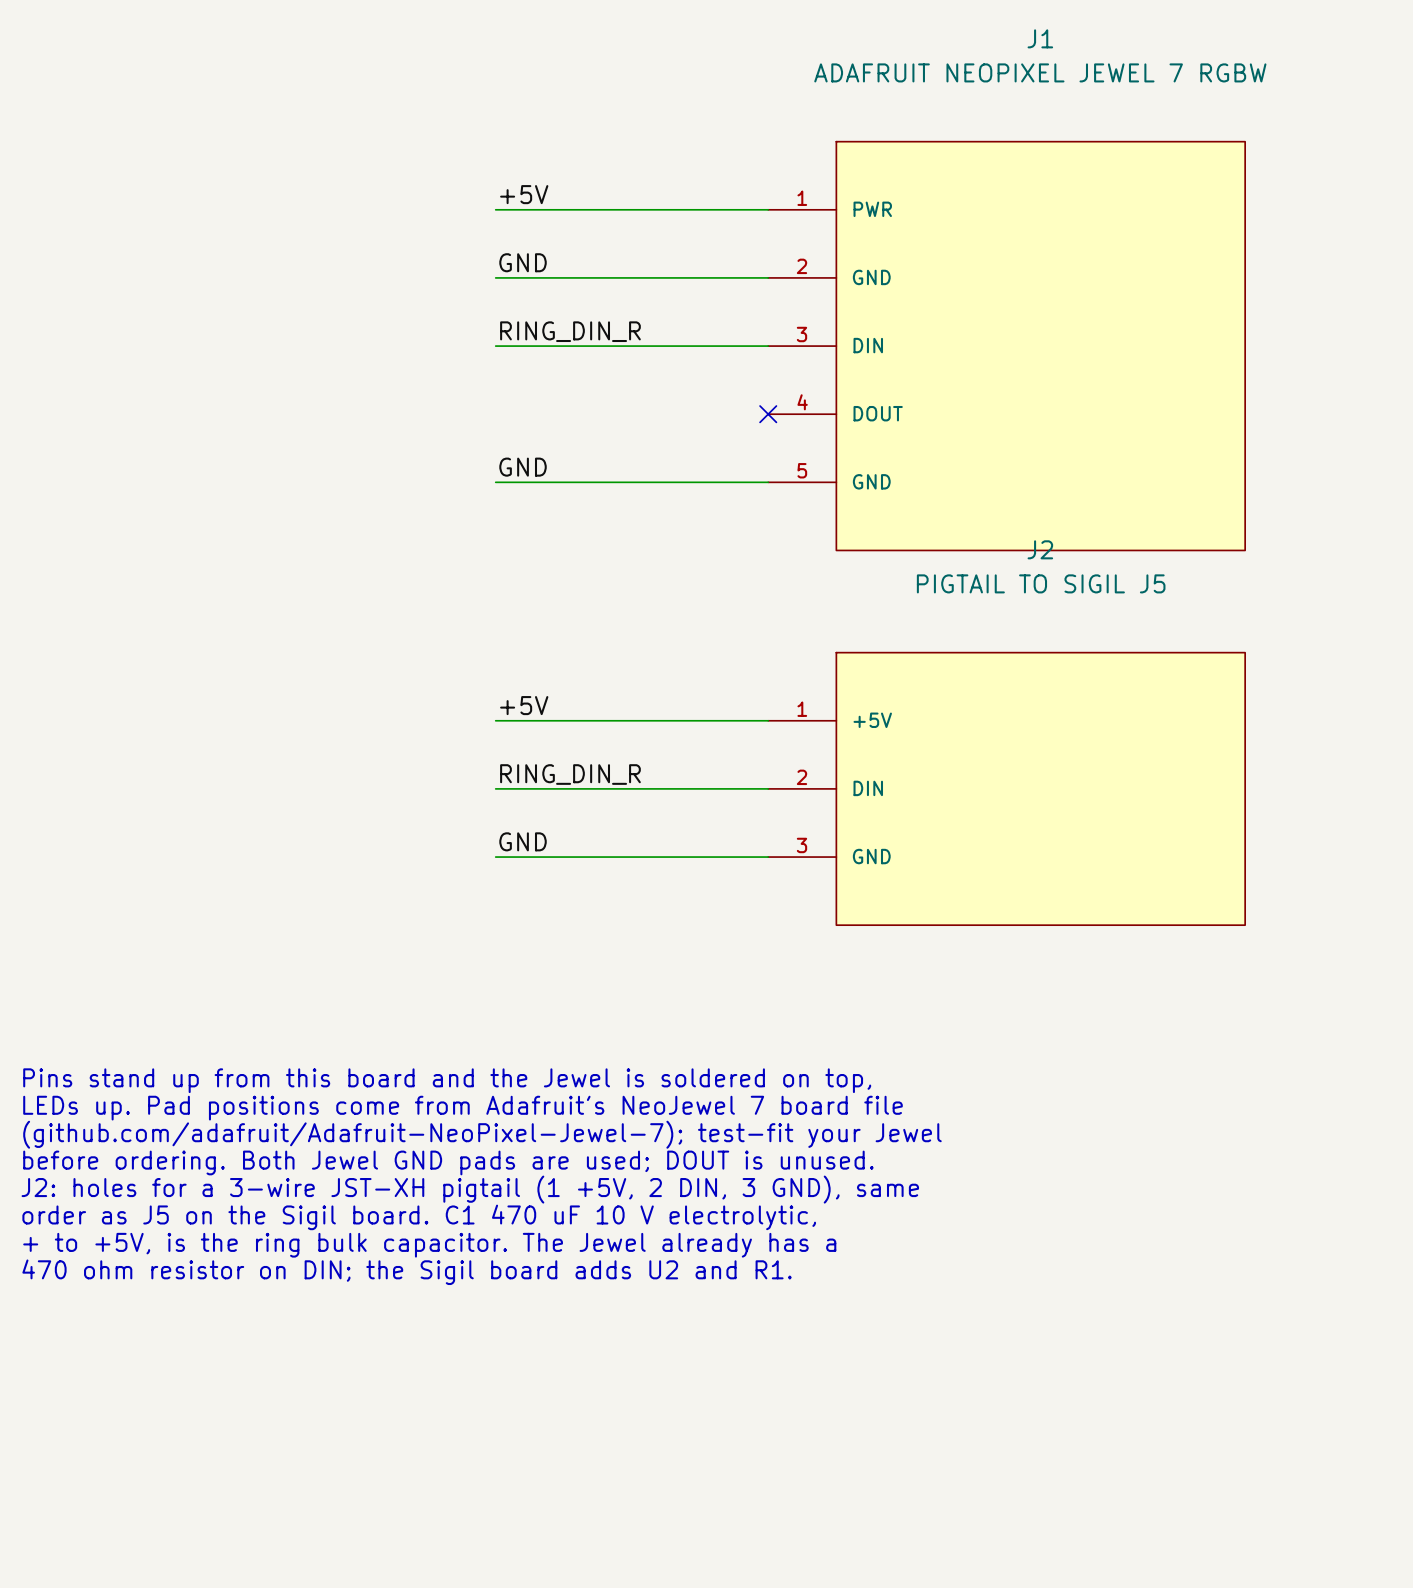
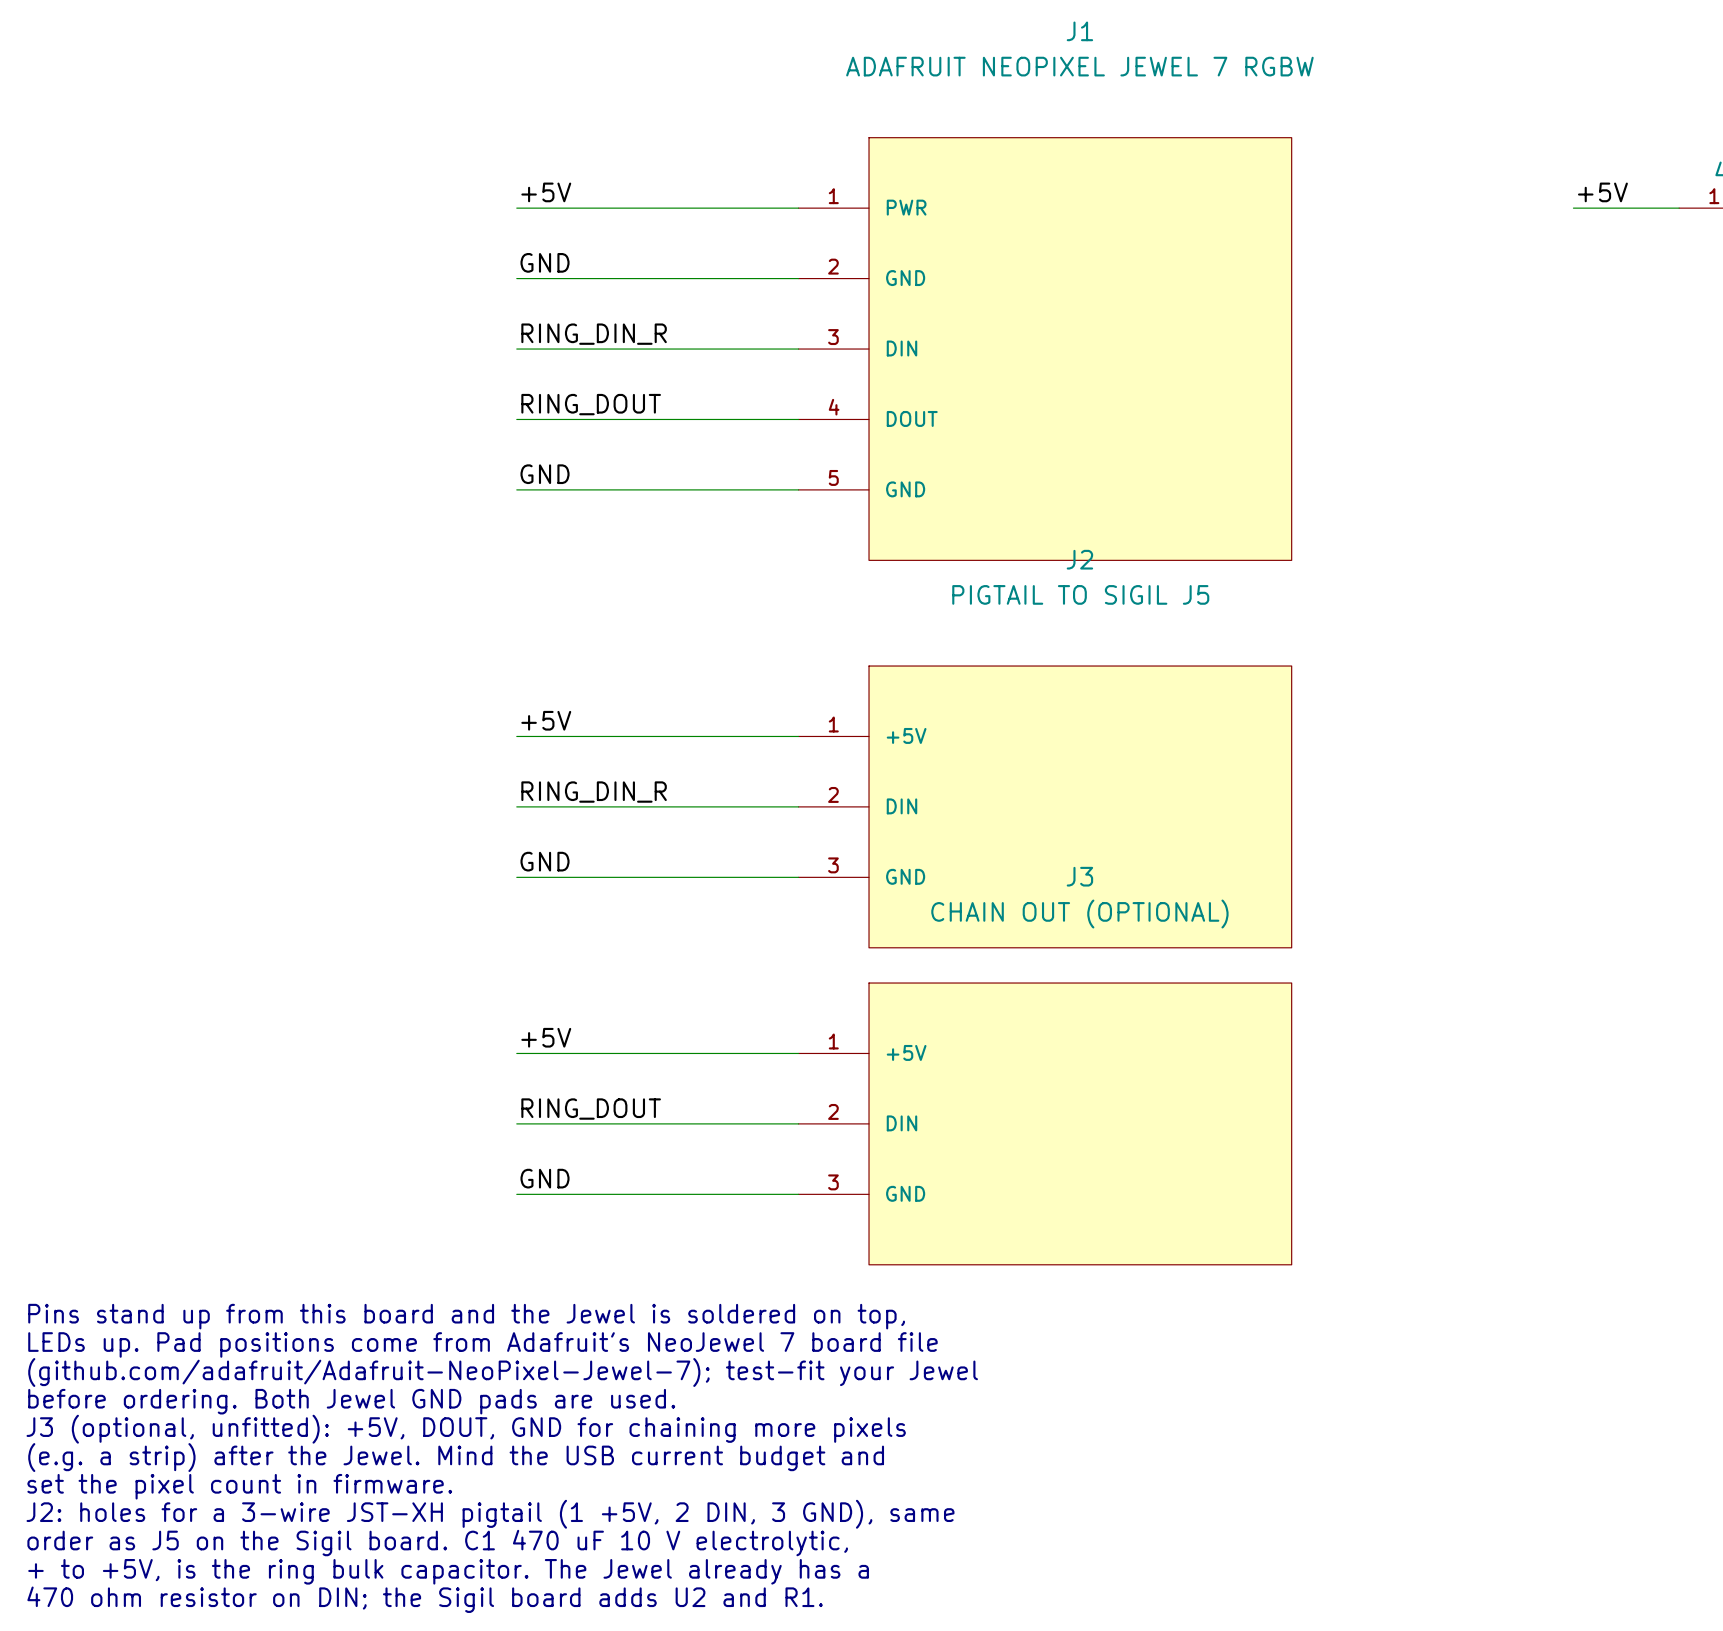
label: none -> RING_DOUT (591, 404)
wire: none -> (516, 419) (798, 419)
no-connect mark: (768, 414) -> none
label: none -> +5V (546, 1037)
wire: none -> (516, 1053) (798, 1053)
text position: Pins stand up from this board and the Jewel is soldered on top, (447, 1080) -> Pins stand up from this board and the Jewel is soldered on top, (466, 1316)
label: none -> RING_DOUT (591, 1109)
wire: none -> (516, 1123) (798, 1123)
J3: none -> CHAIN OUT (OPTIONAL) (1045, 1123)
text position: LEDs up. Pad positions come from Adafruit's NeoJewel 7 board file (463, 1108) -> LEDs up. Pad positions come from Adafruit's NeoJewel 7 board file (482, 1344)
text position: (github.com/adafruit/Adafruit-NeoPixel-Jewel-7); test-fit your Jewel (482, 1134) -> (github.com/adafruit/Adafruit-NeoPixel-Jewel-7); test-fit your Jewel (503, 1372)
label: none -> GND (545, 1178)
text: before ordering. Both Jewel GND pads are used; DOUT is unused. (448, 1162) -> none
wire: none -> (516, 1194) (798, 1194)
text position: J2: holes for a 3-wire JST-XH pigtail (1 +5V, 2 DIN, 3 GND), same (470, 1189) -> J2: holes for a 3-wire JST-XH pigtail (1 +5V, 2 DIN, 3 GND), same (490, 1514)
text position: order as J5 on the Sigil board. C1 470 uF 10 V electrolytic, (419, 1217) -> order as J5 on the Sigil board. C1 470 uF 10 V electrolytic, (437, 1543)
text position: + to +5V, is the ring bulk capacitor. The Jewel already has a (429, 1245) -> + to +5V, is the ring bulk capacitor. The Jewel already has a (448, 1571)
text position: 470 ohm resistor on DIN; the Sigil board adds U2 and R1. (407, 1272) -> 470 ohm resistor on DIN; the Sigil board adds U2 and R1. (425, 1599)
text: none -> before ordering. Both Jewel GND pads are used. (351, 1401)
text: none -> J3 (optional, unfitted): +5V, DOUT, GND for chaining more pixels (466, 1429)
text: none -> (e.g. a strip) after the Jewel. Mind the USB current budget and (456, 1457)
text: none -> set the pixel count in firmware. (239, 1486)

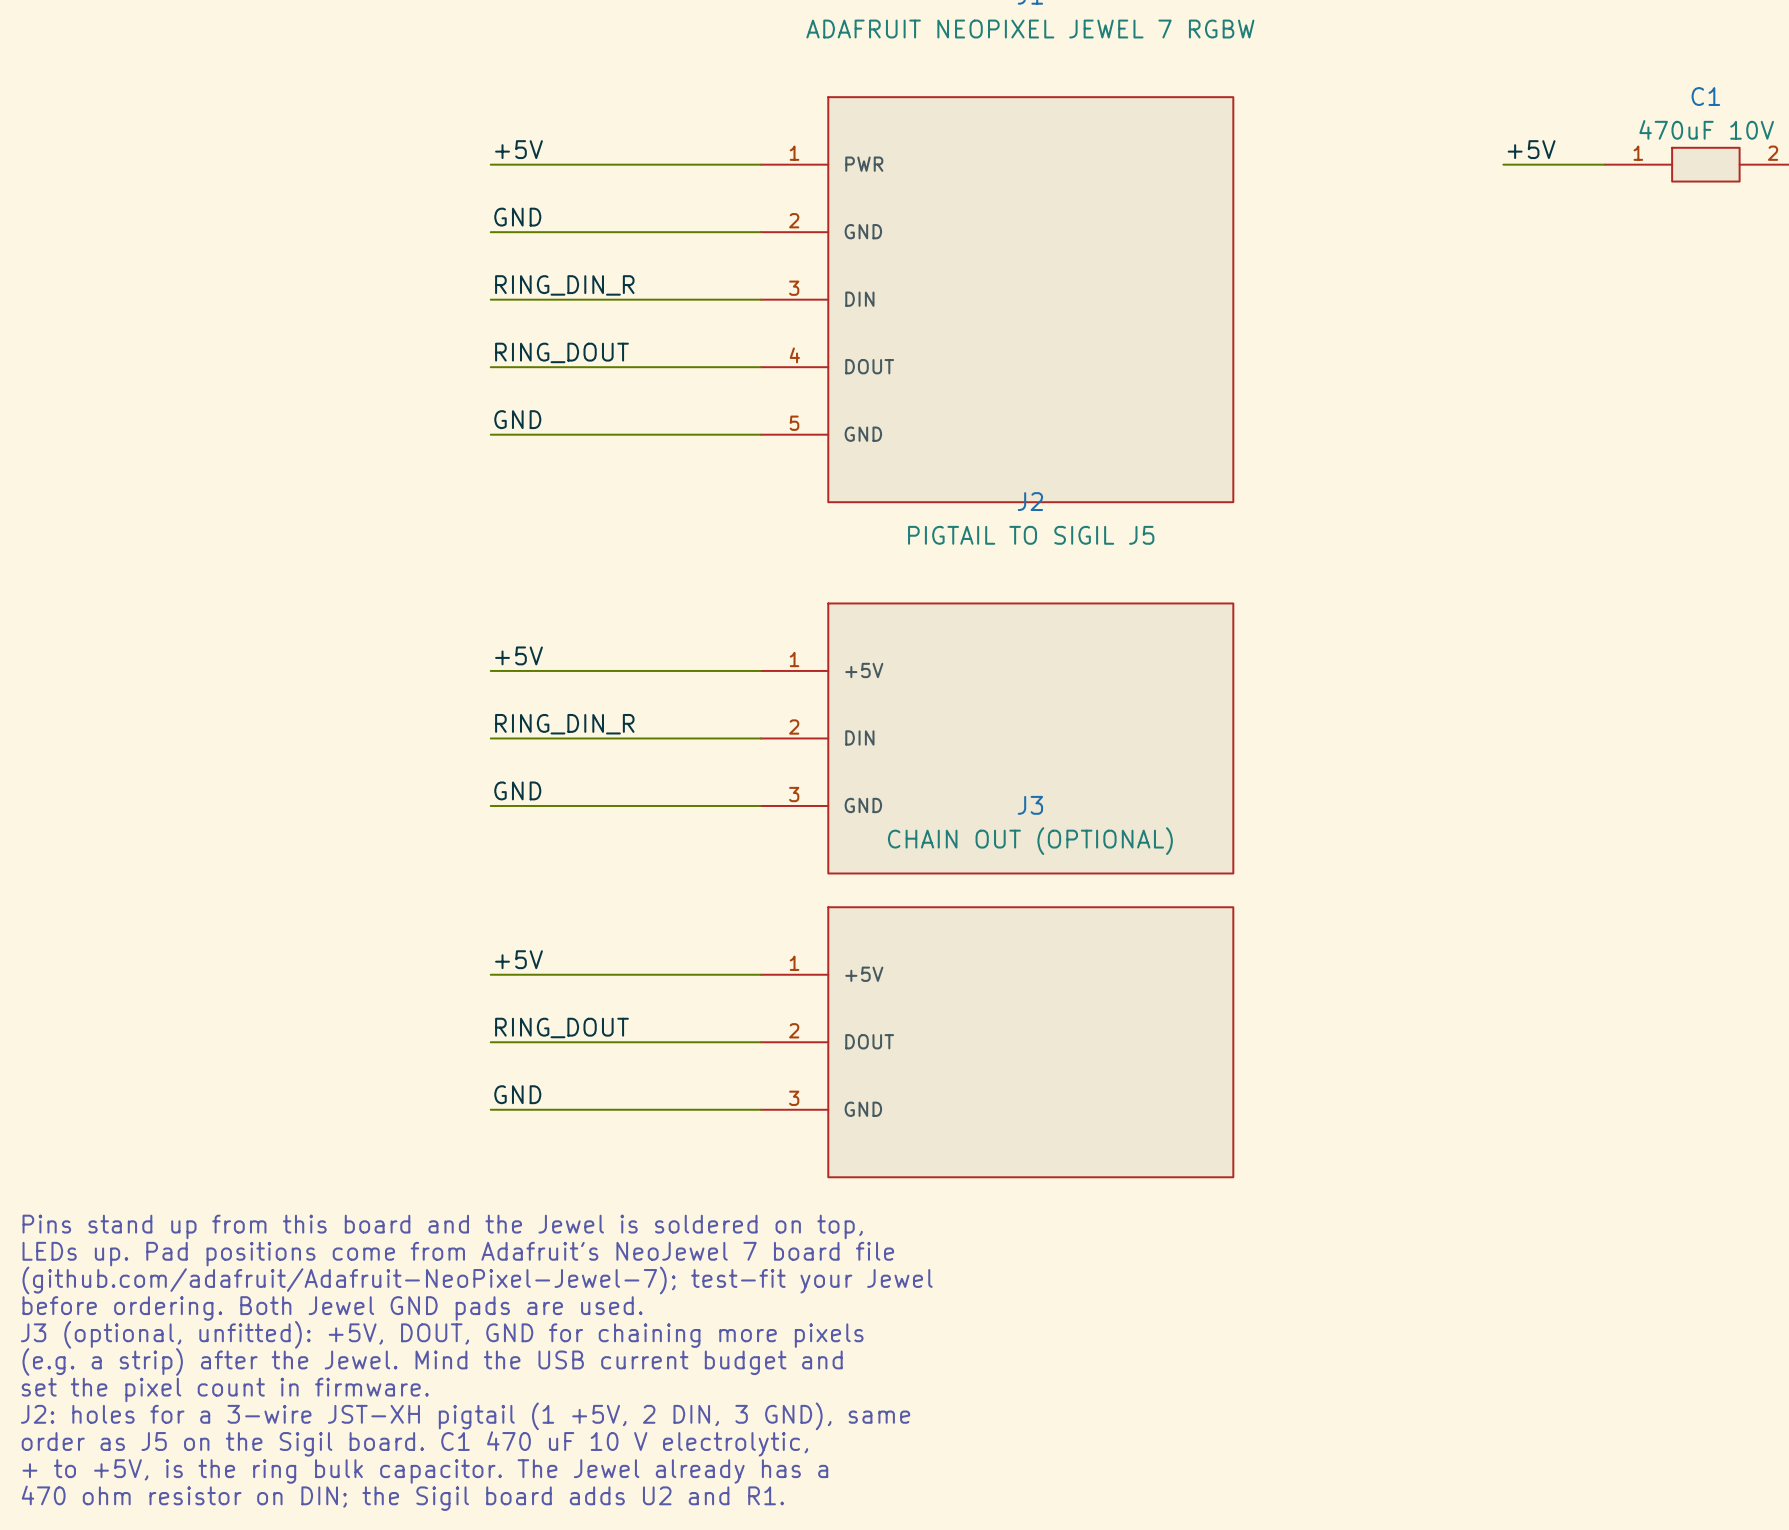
J3 pin name: DIN (901, 1123) -> DOUT (869, 1041)

